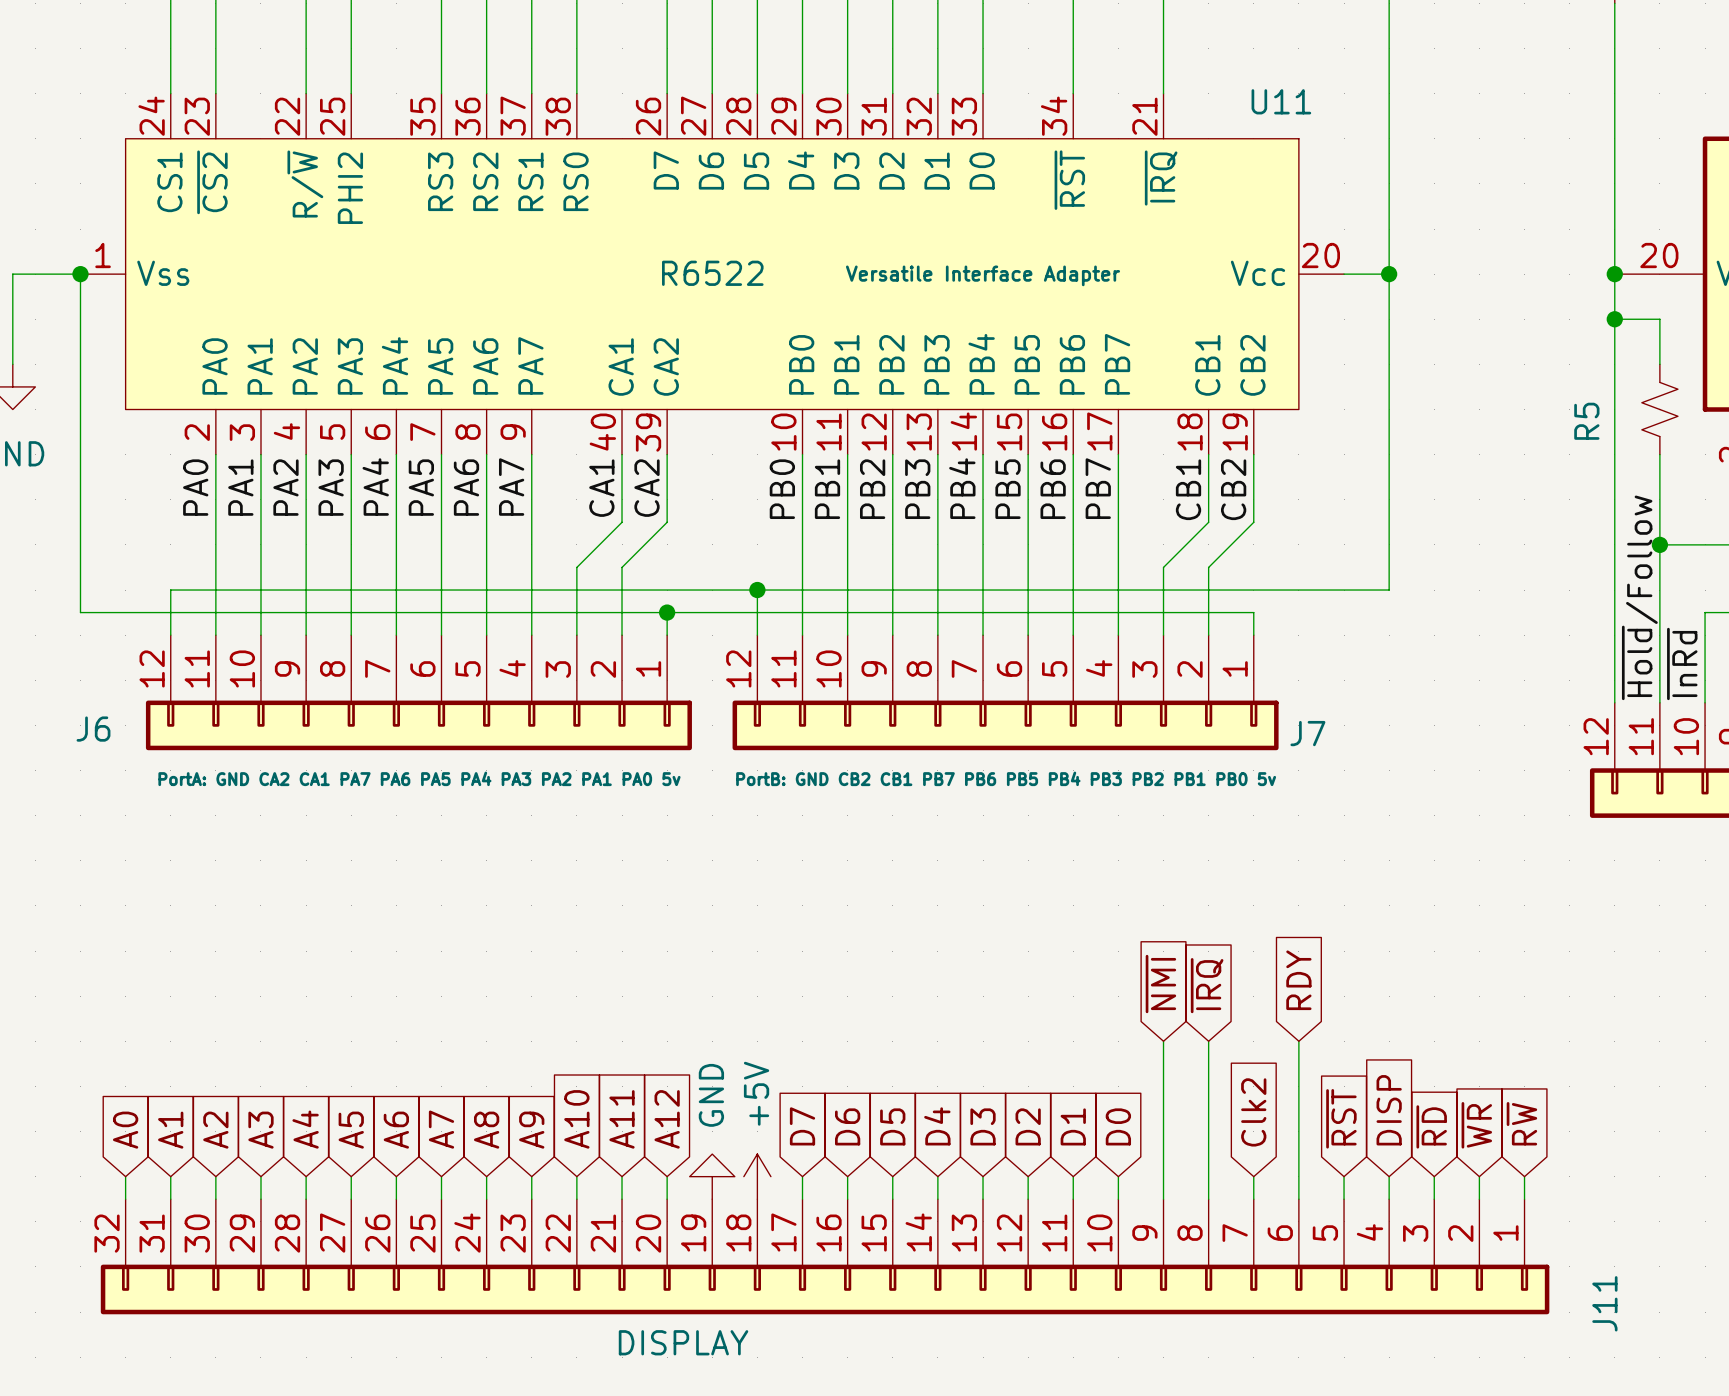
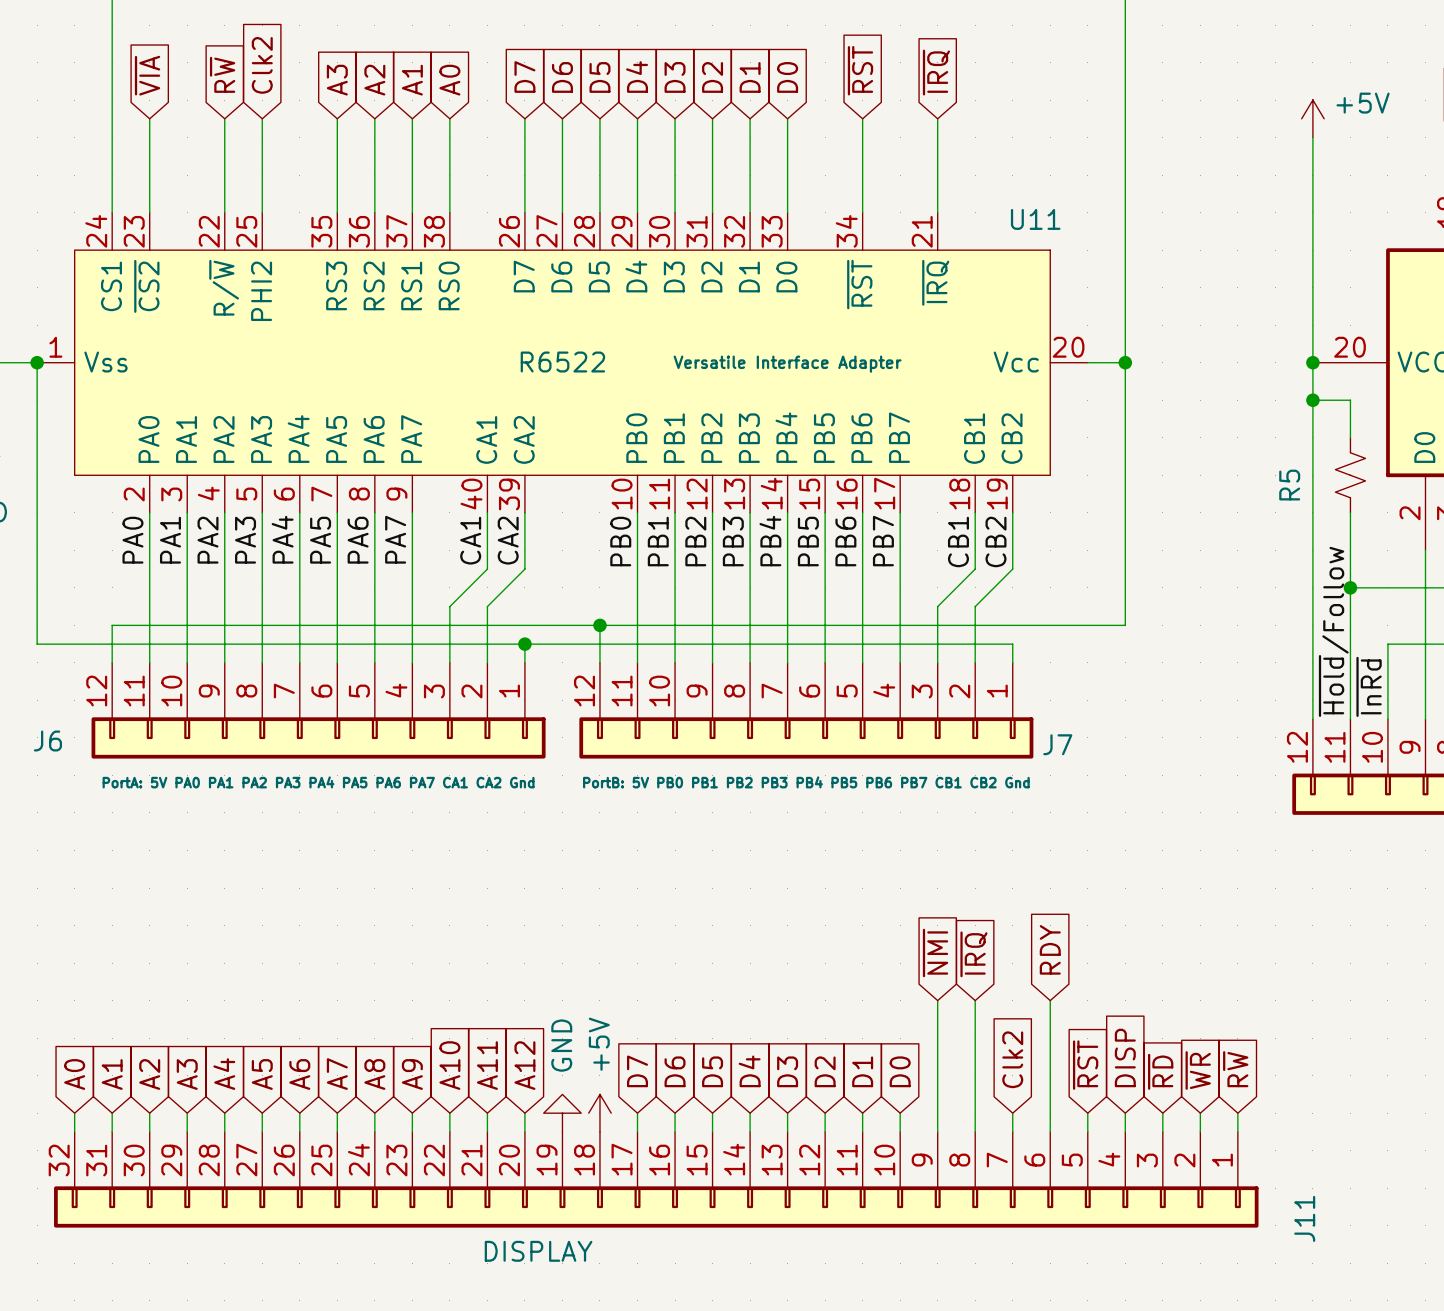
J6 value: PortA: GND CA2 CA1 PA7 PA6 PA5 PA4 PA3 PA2 PA1 PA0 5v (419, 778) -> PortA: 5V PA0 PA1 PA2 PA3 PA4 PA5 PA6 PA7 CA1 CA2 Gnd (318, 782)
J7 value: PortB: GND CB2 CB1 PB7 PB6 PB5 PB4 PB3 PB2 PB1 PB0 5v (1006, 778) -> PortB: 5V PB0 PB1 PB2 PB3 PB4 PB5 PB6 PB7 CB1 CB2 Gnd (806, 782)

